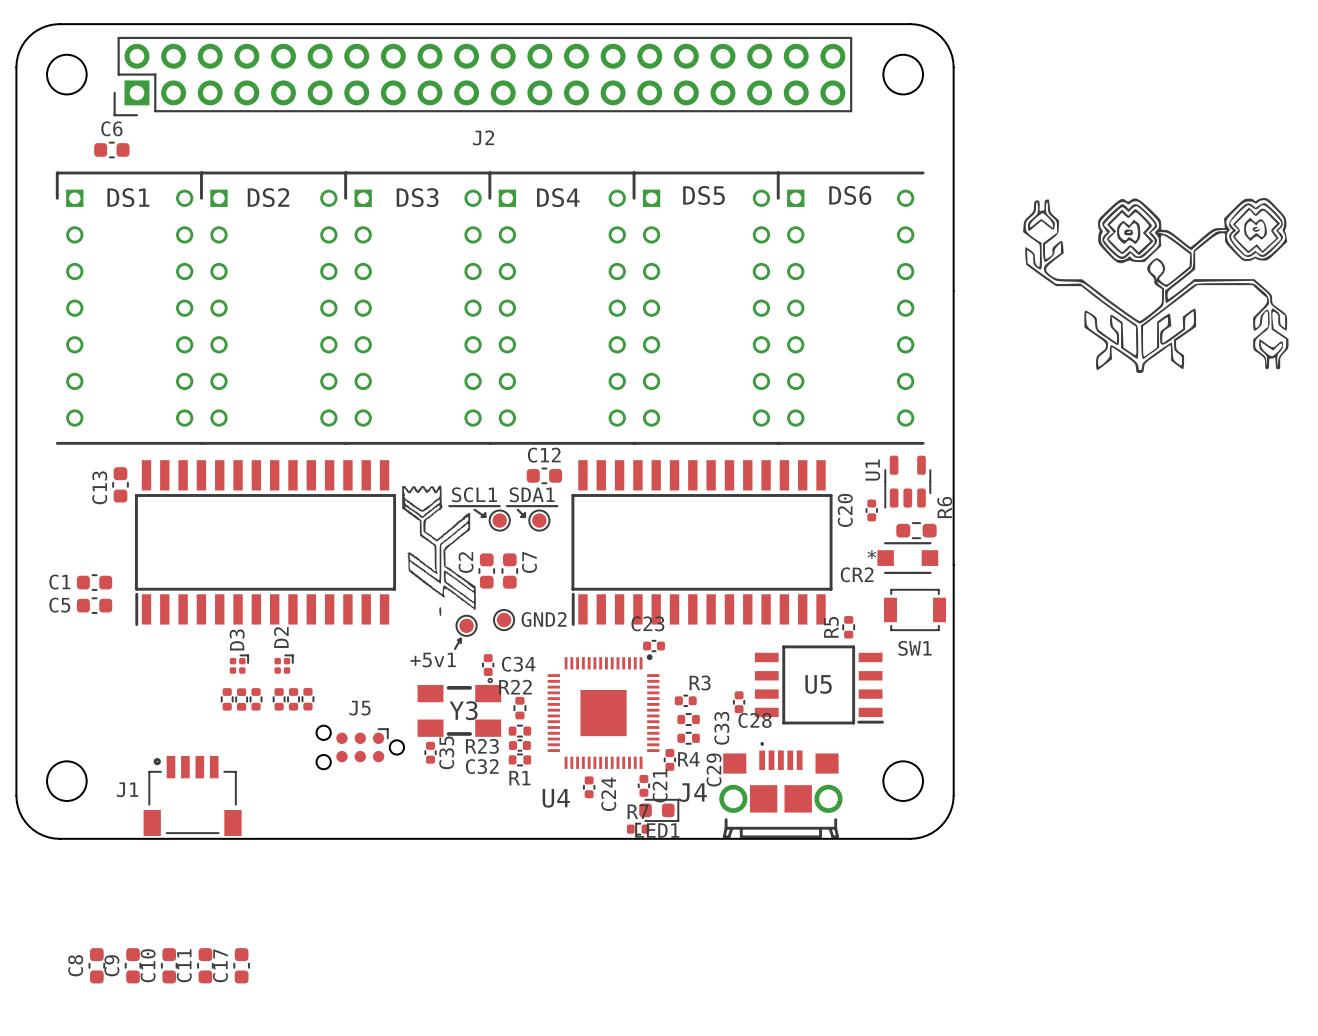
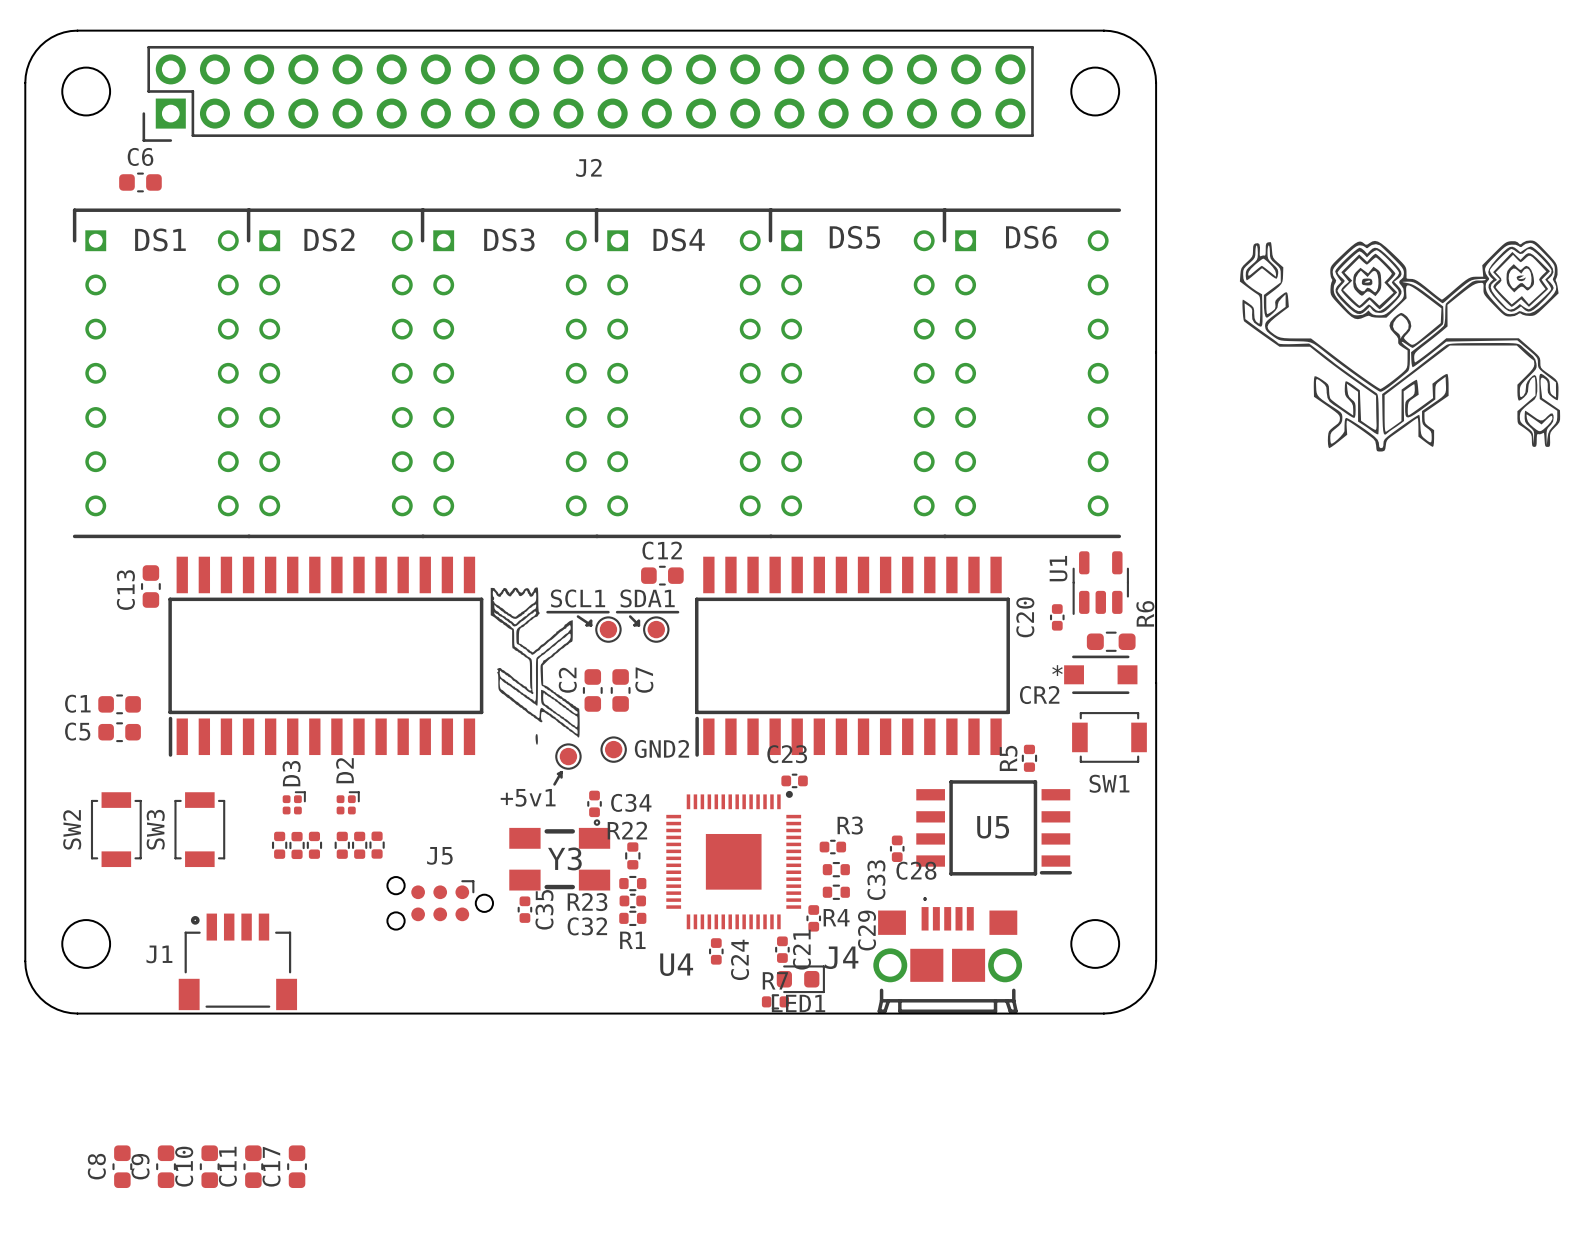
SW2: none -> (116, 829)
SW3: none -> (199, 829)

